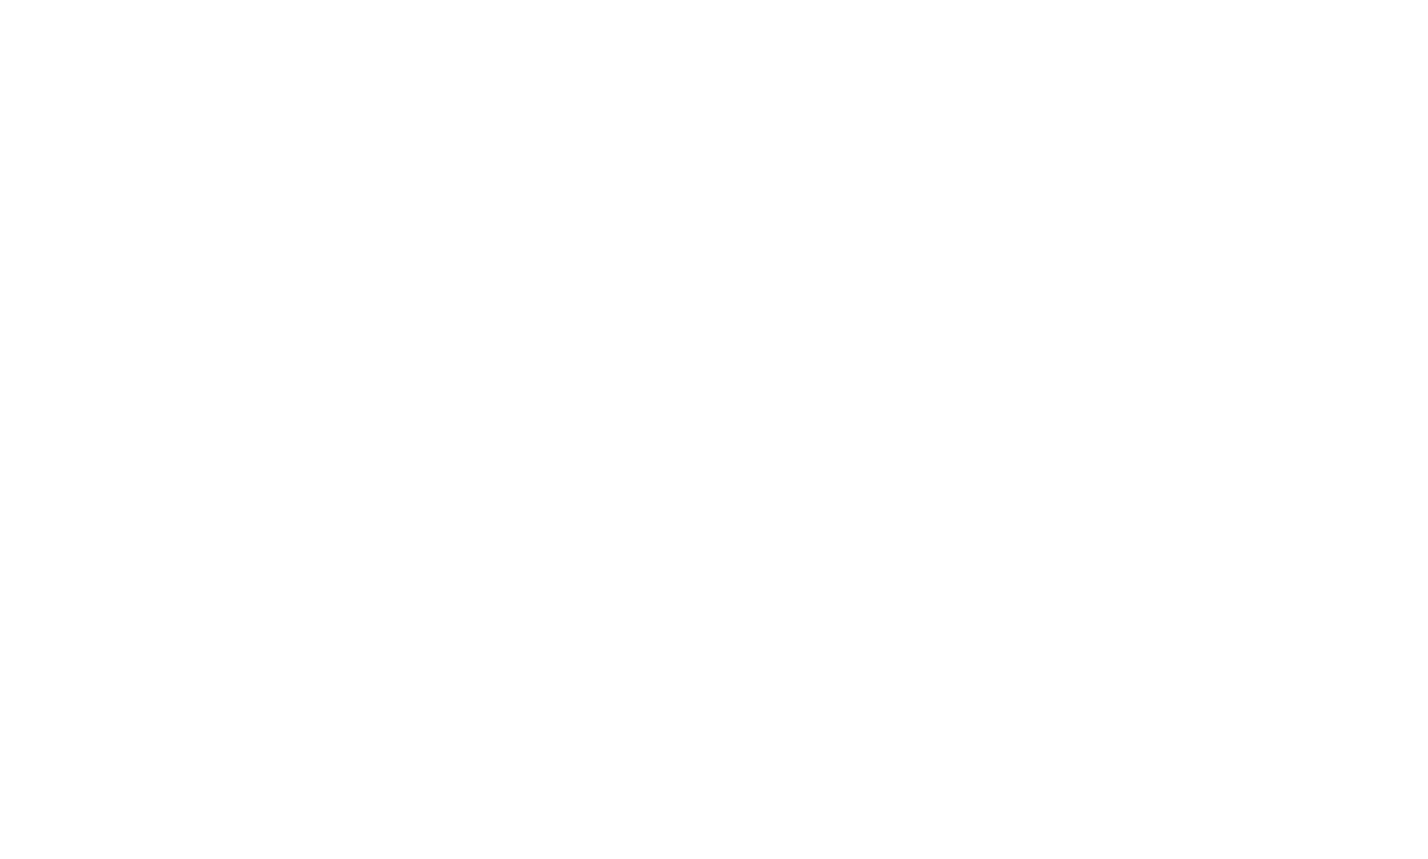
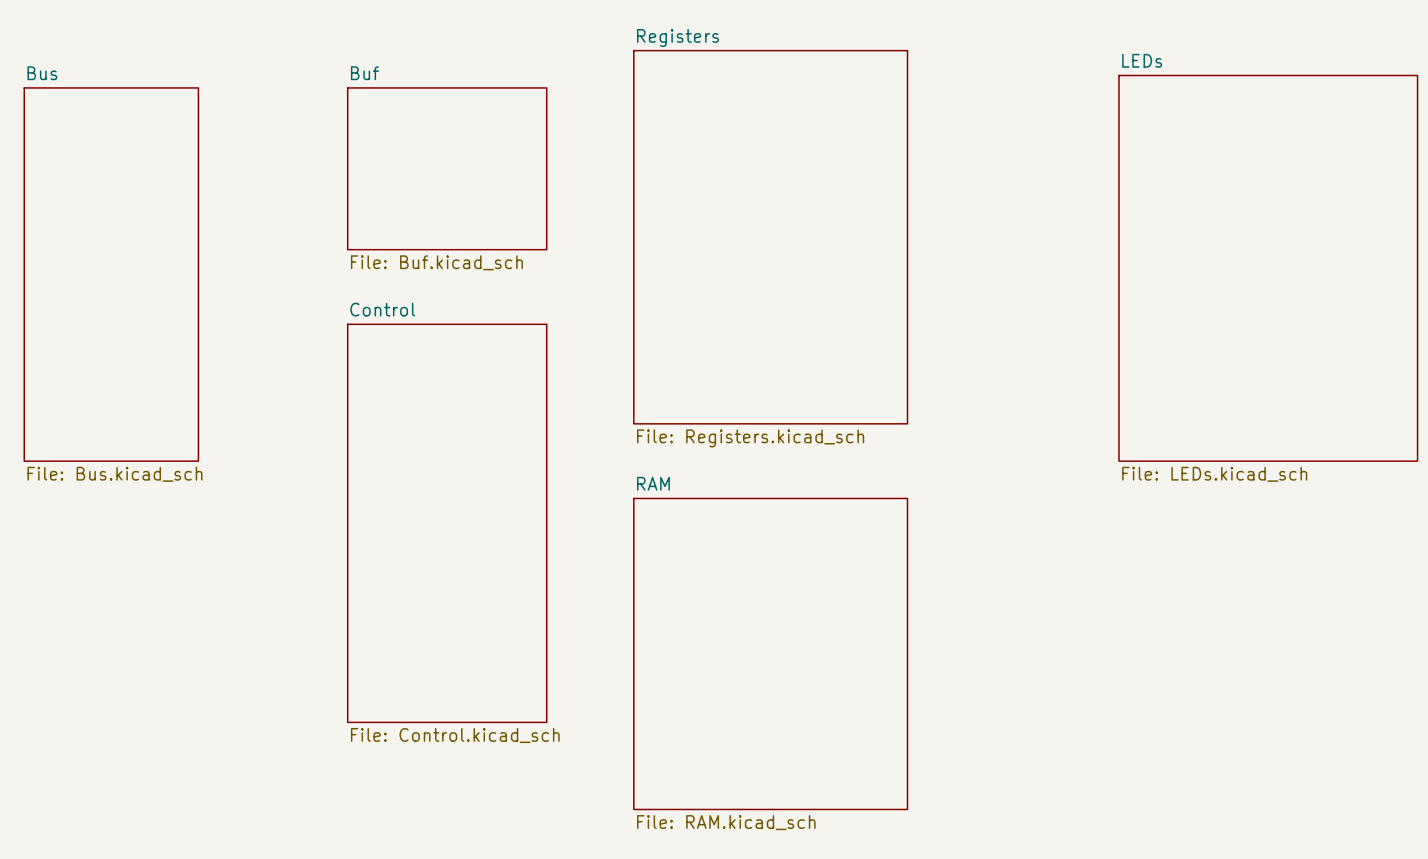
sheet Buf: none -> File: Buf.kicad_sch (447, 168)
sheet Registers: none -> File: Registers.kicad_sch (770, 237)
sheet LEDs: none -> File: LEDs.kicad_sch (1268, 268)
sheet Bus: none -> File: Bus.kicad_sch (111, 274)
sheet Control: none -> File: Control.kicad_sch (447, 523)
sheet RAM: none -> File: RAM.kicad_sch (770, 653)

